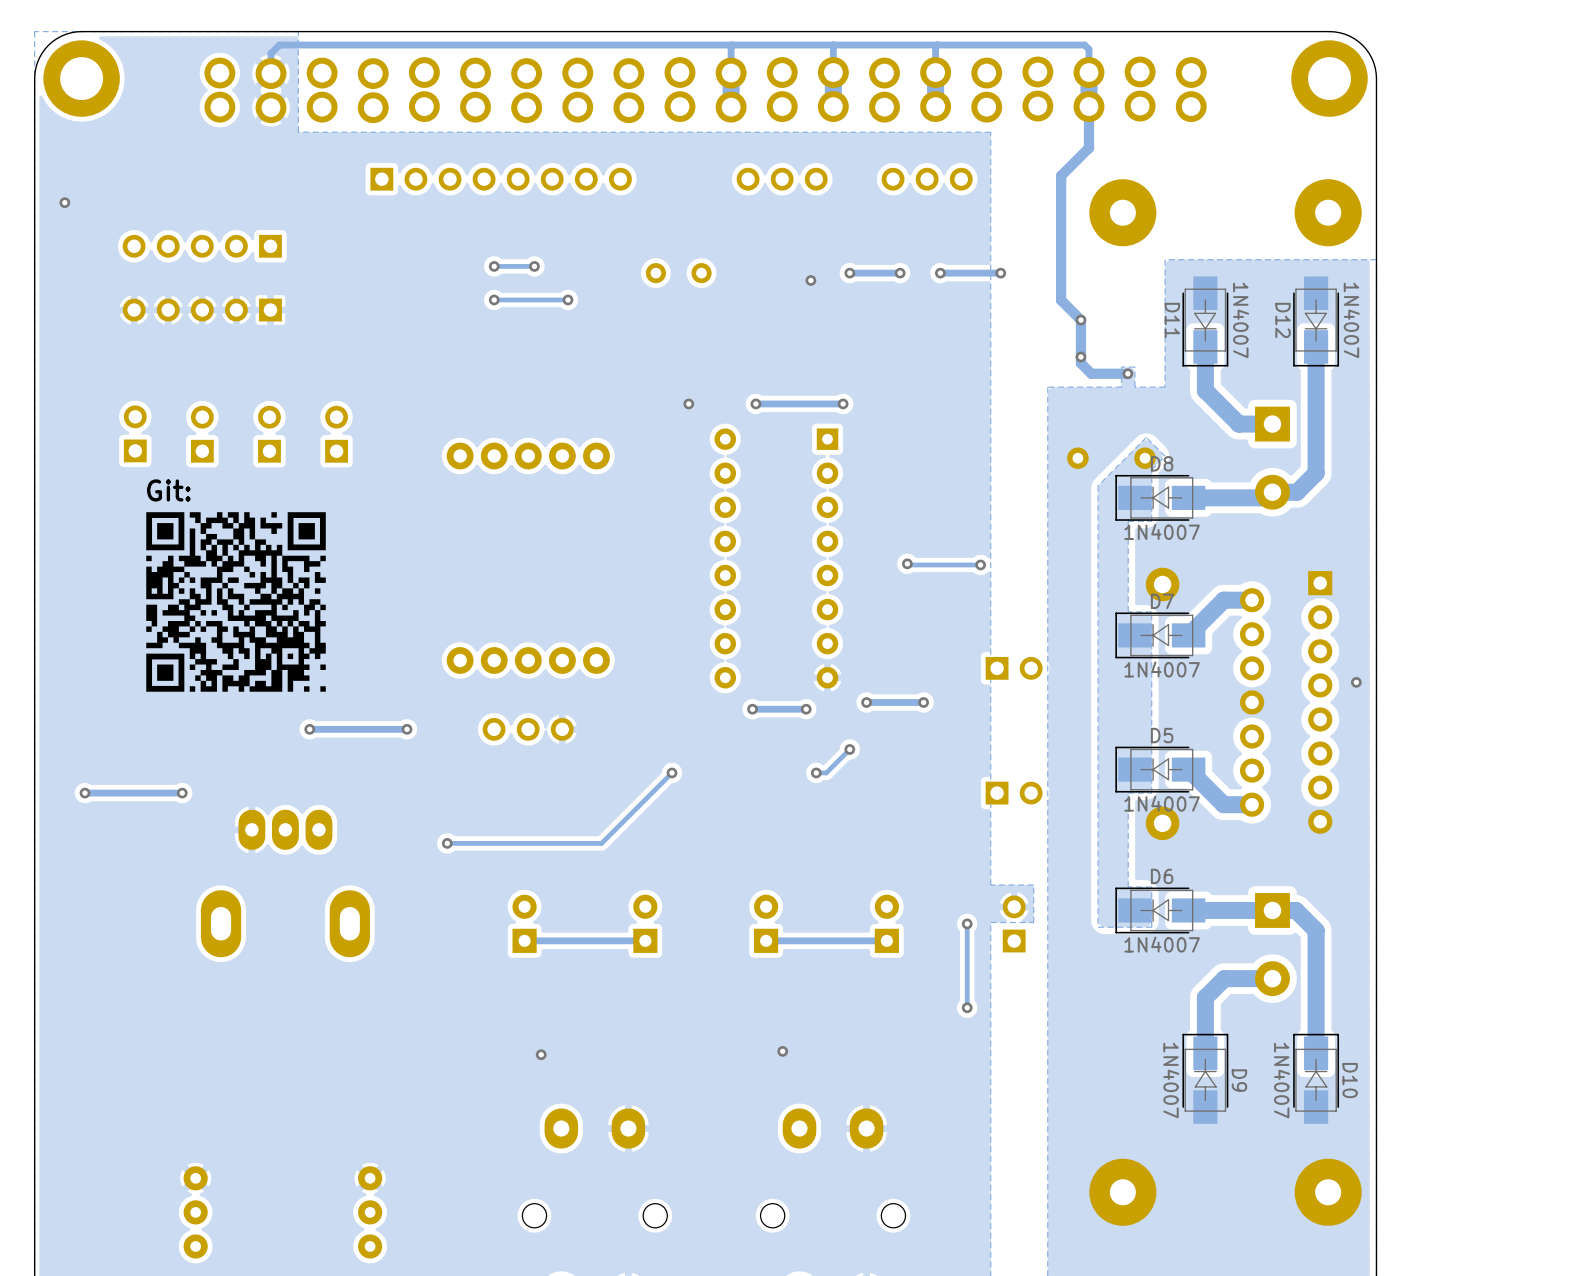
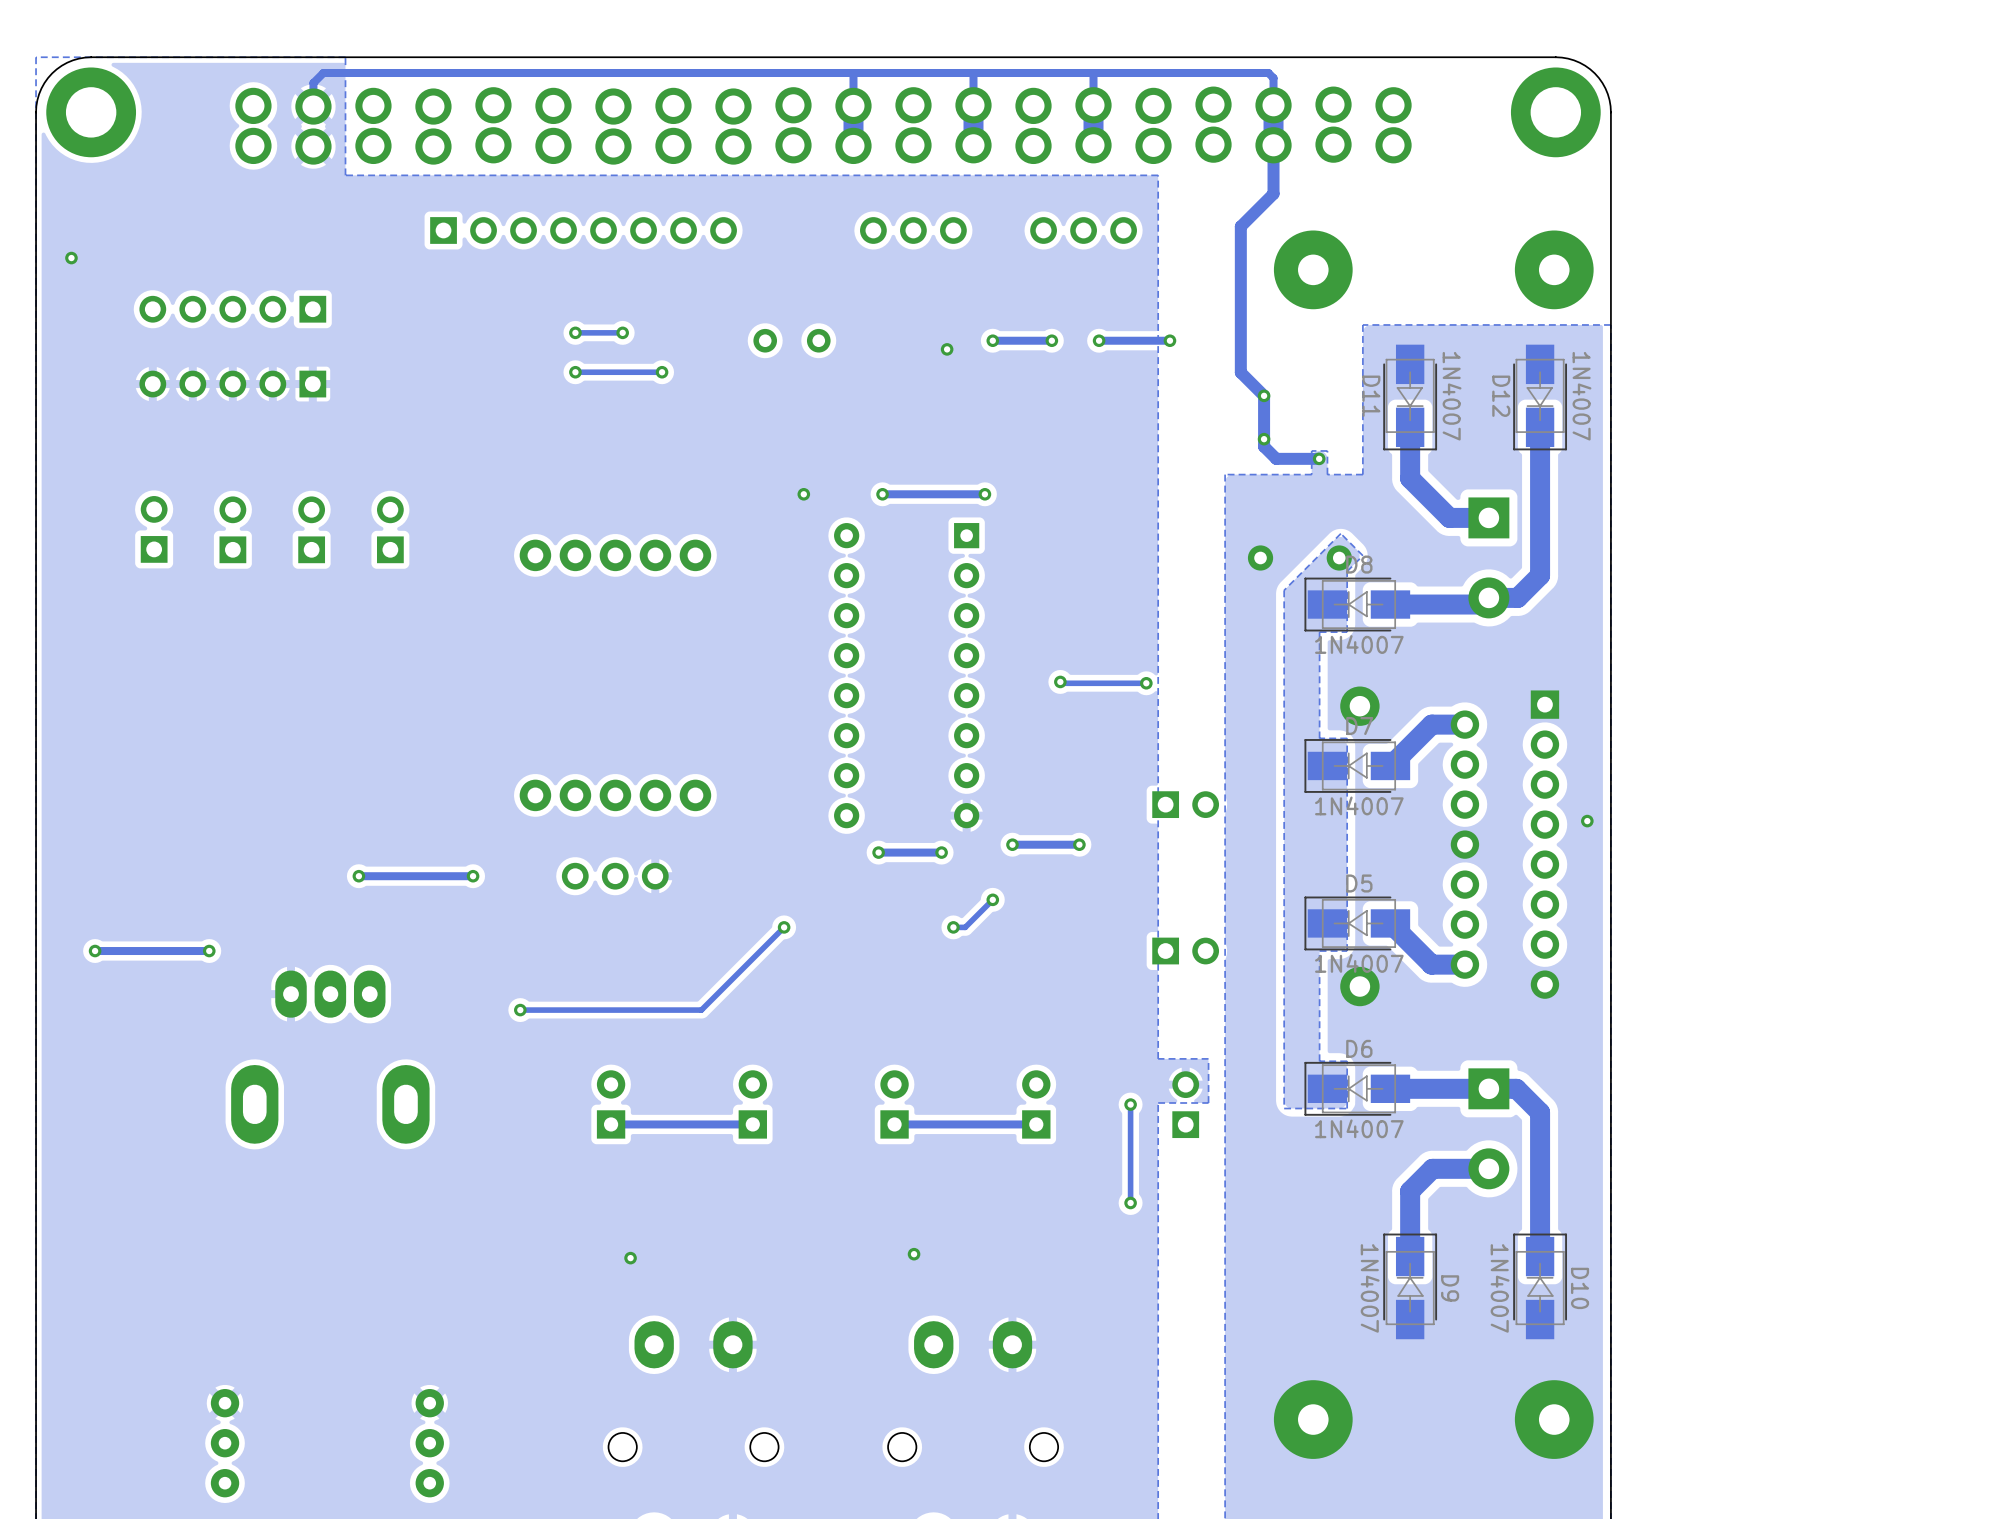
text: Git: (168, 490) -> none
drawing: [146, 512, 326, 692] -> none

